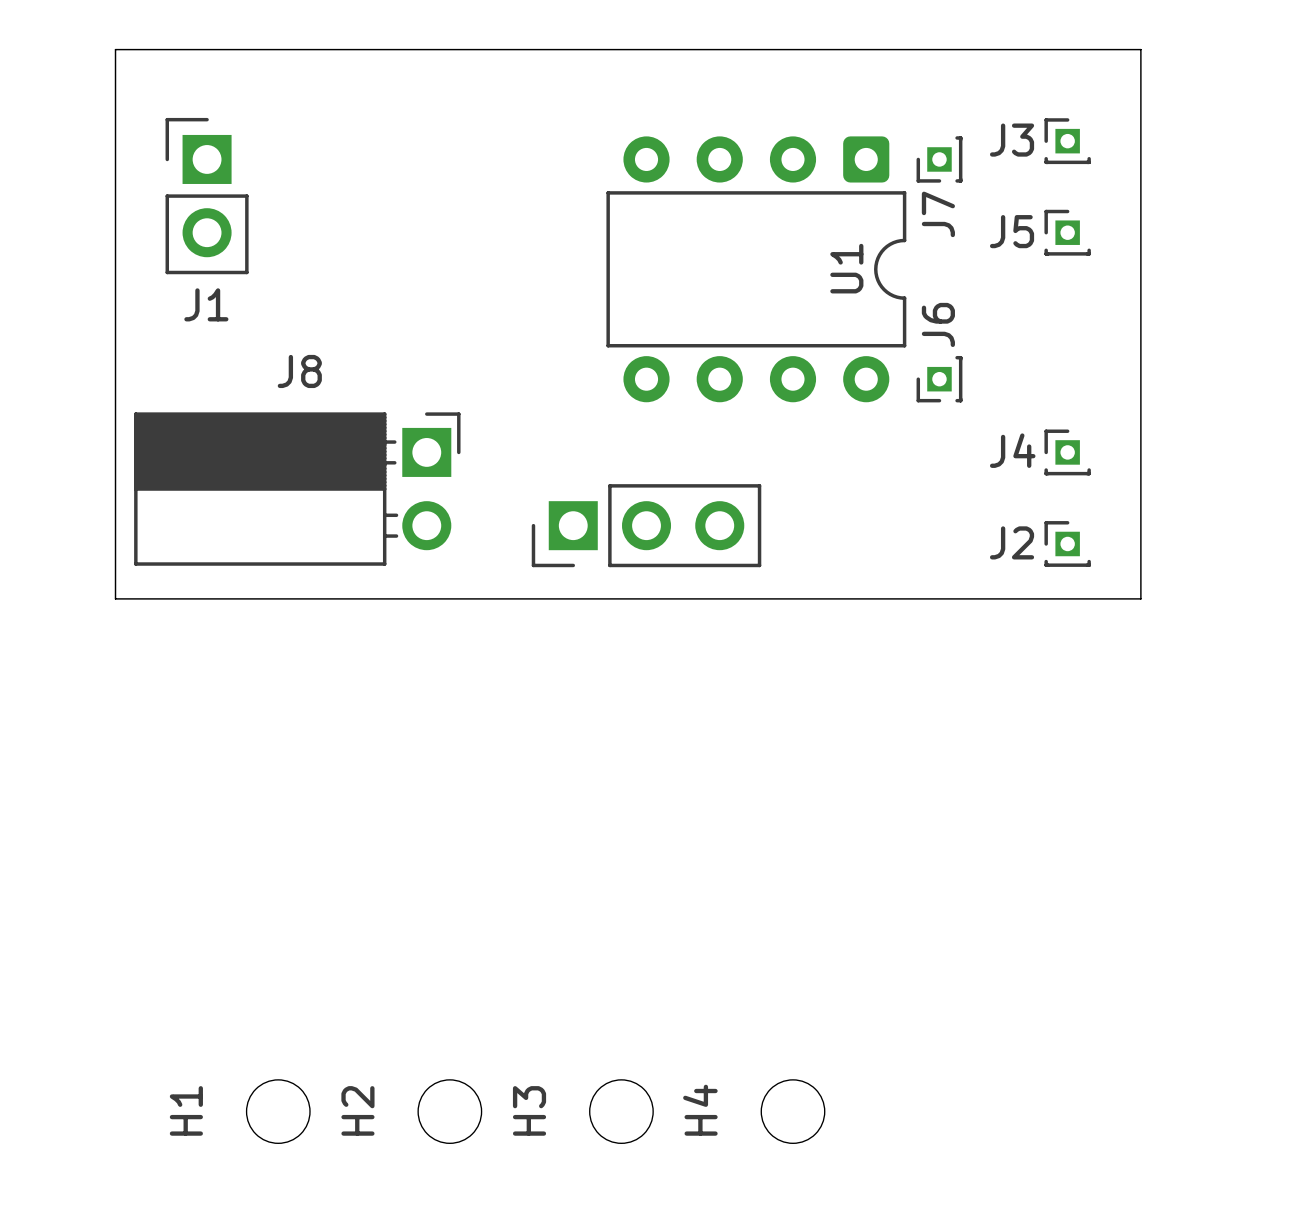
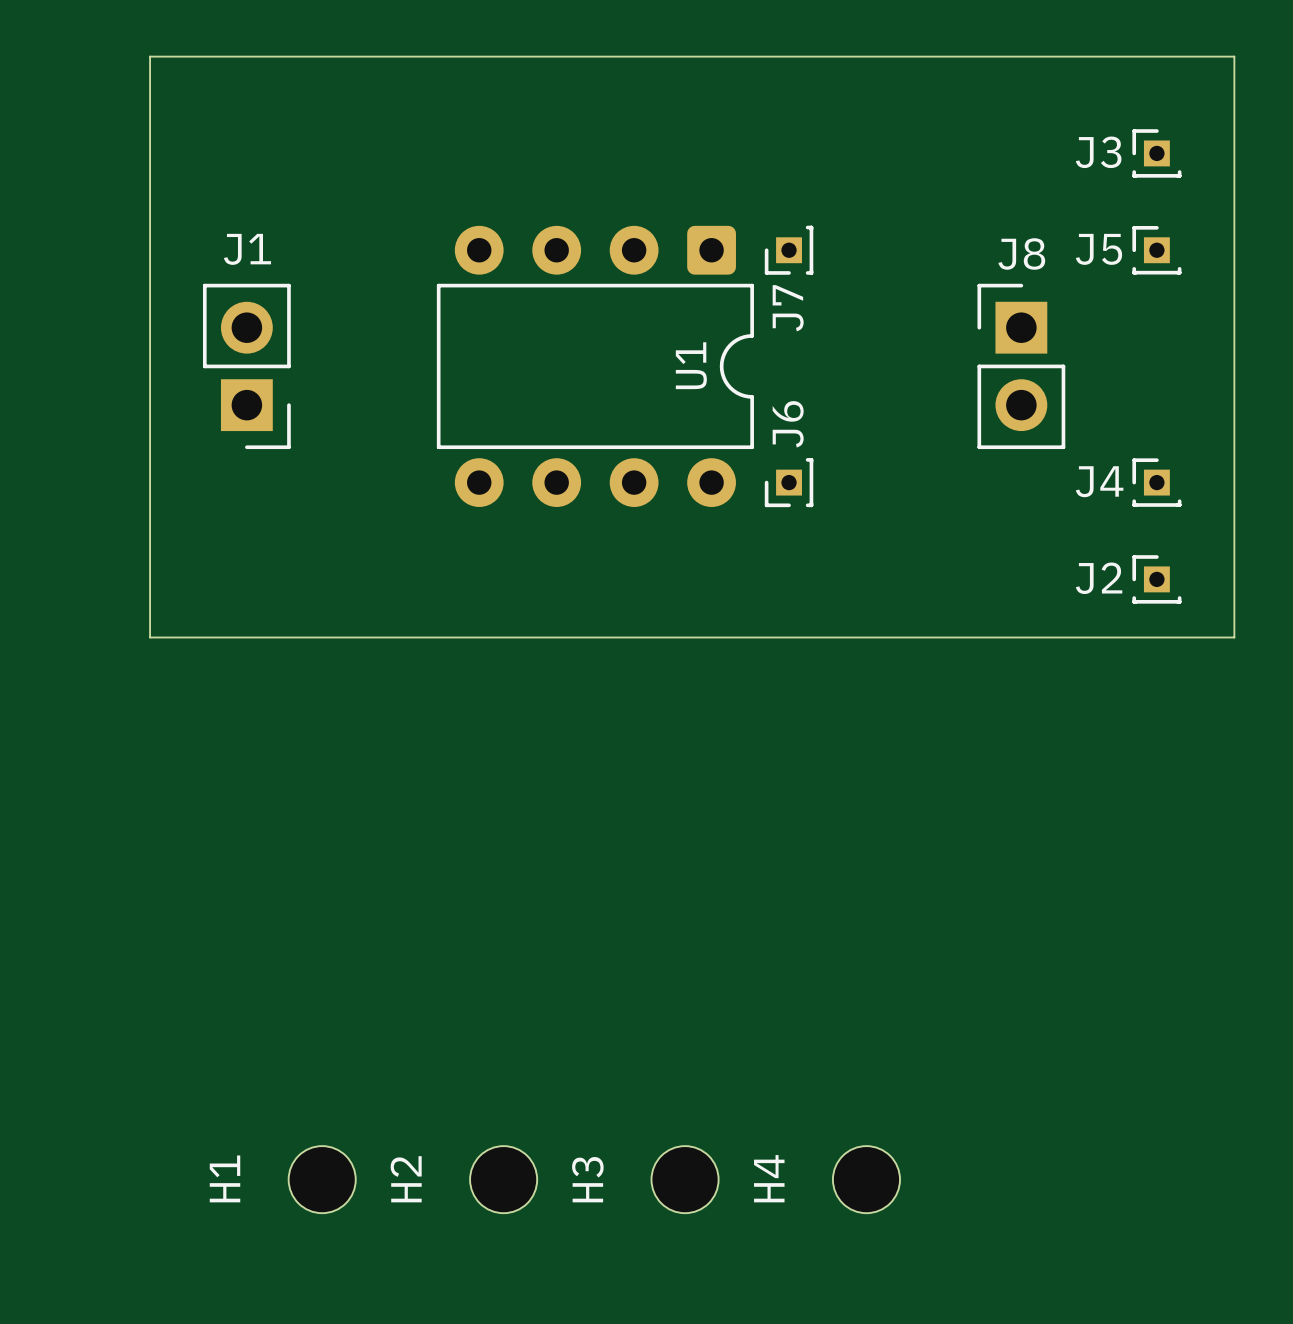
J7 position: (939, 159) -> (789, 250)
J1 rotation: 0° (207, 196) -> 180° (246, 366)
J1 position: (207, 196) -> (246, 366)
U1 position: (756, 269) -> (595, 366)
J6 position: (939, 379) -> (789, 482)
J8 footprint: [134, 412, 461, 566] -> [977, 283, 1066, 450]
part: (646, 525) -> none

